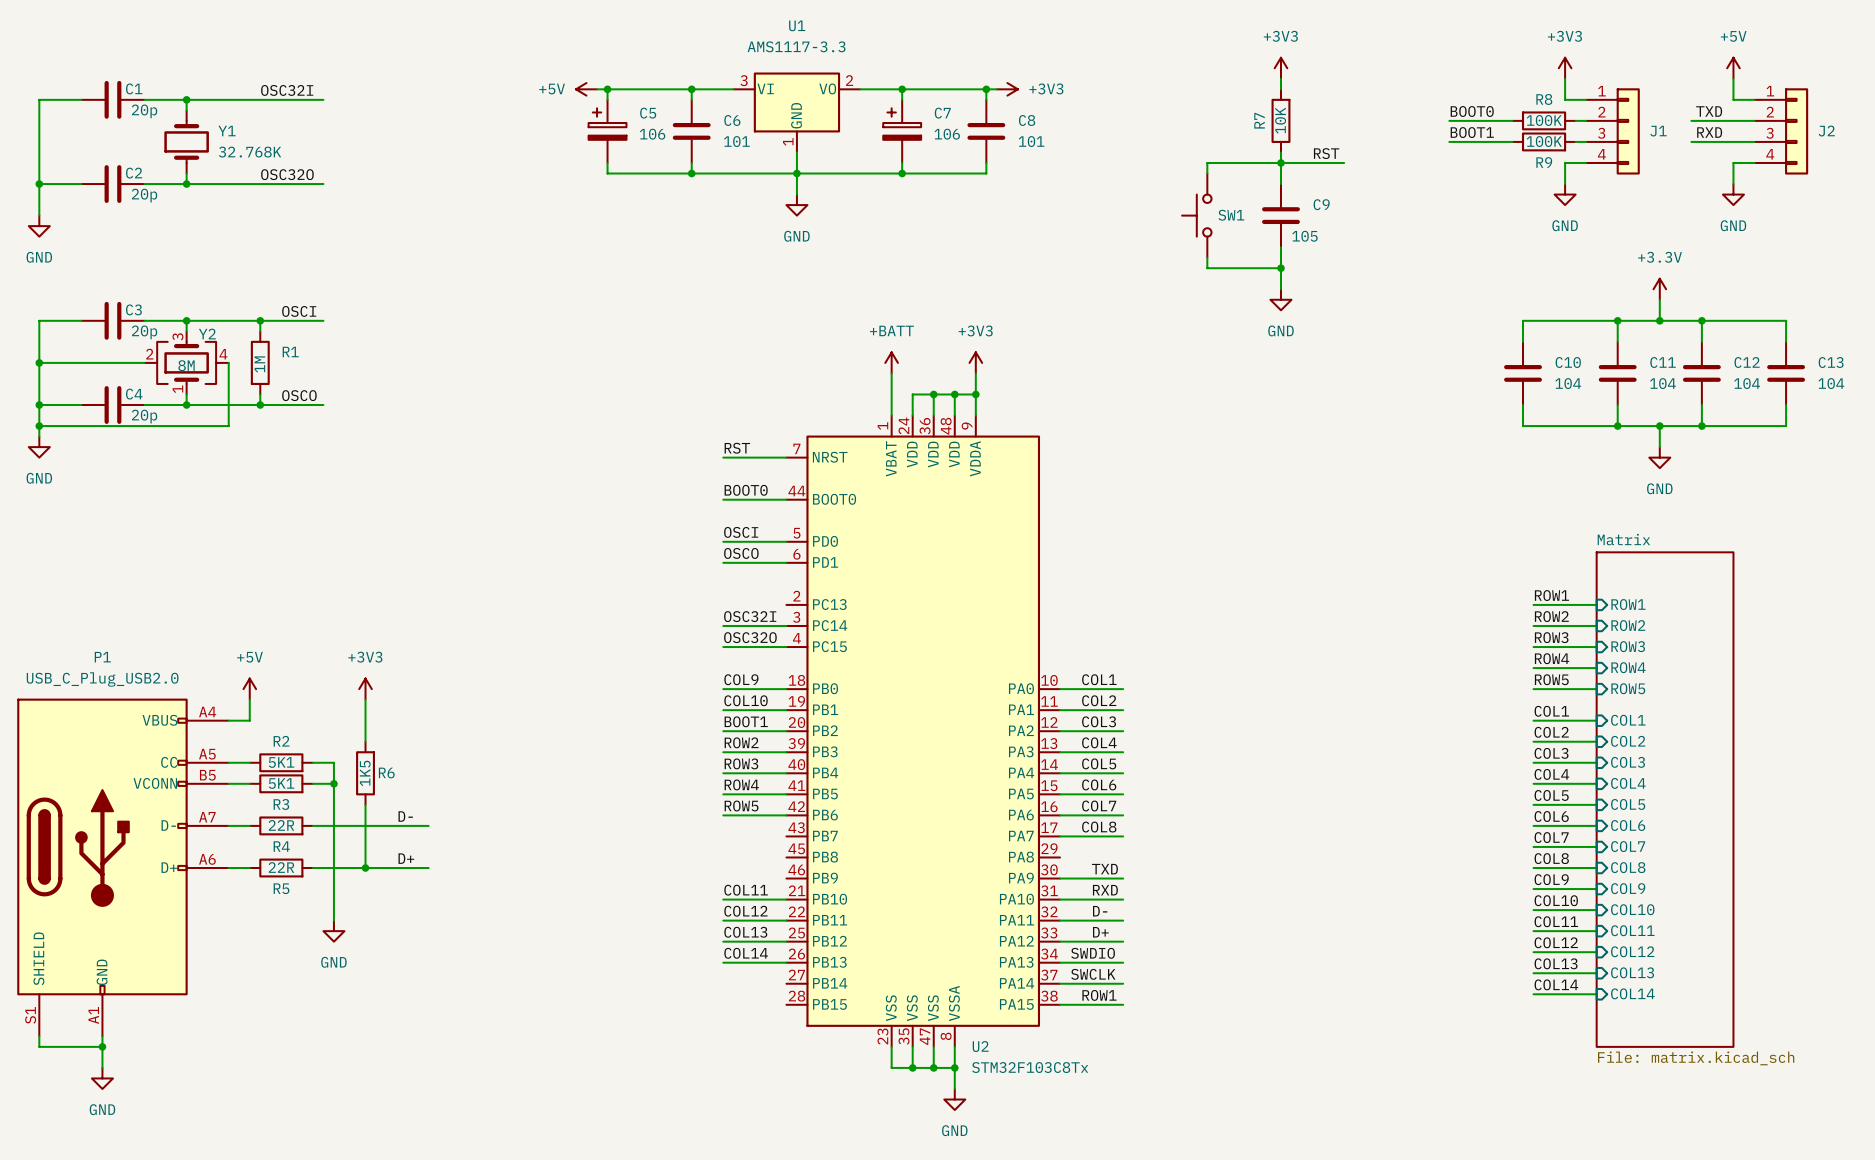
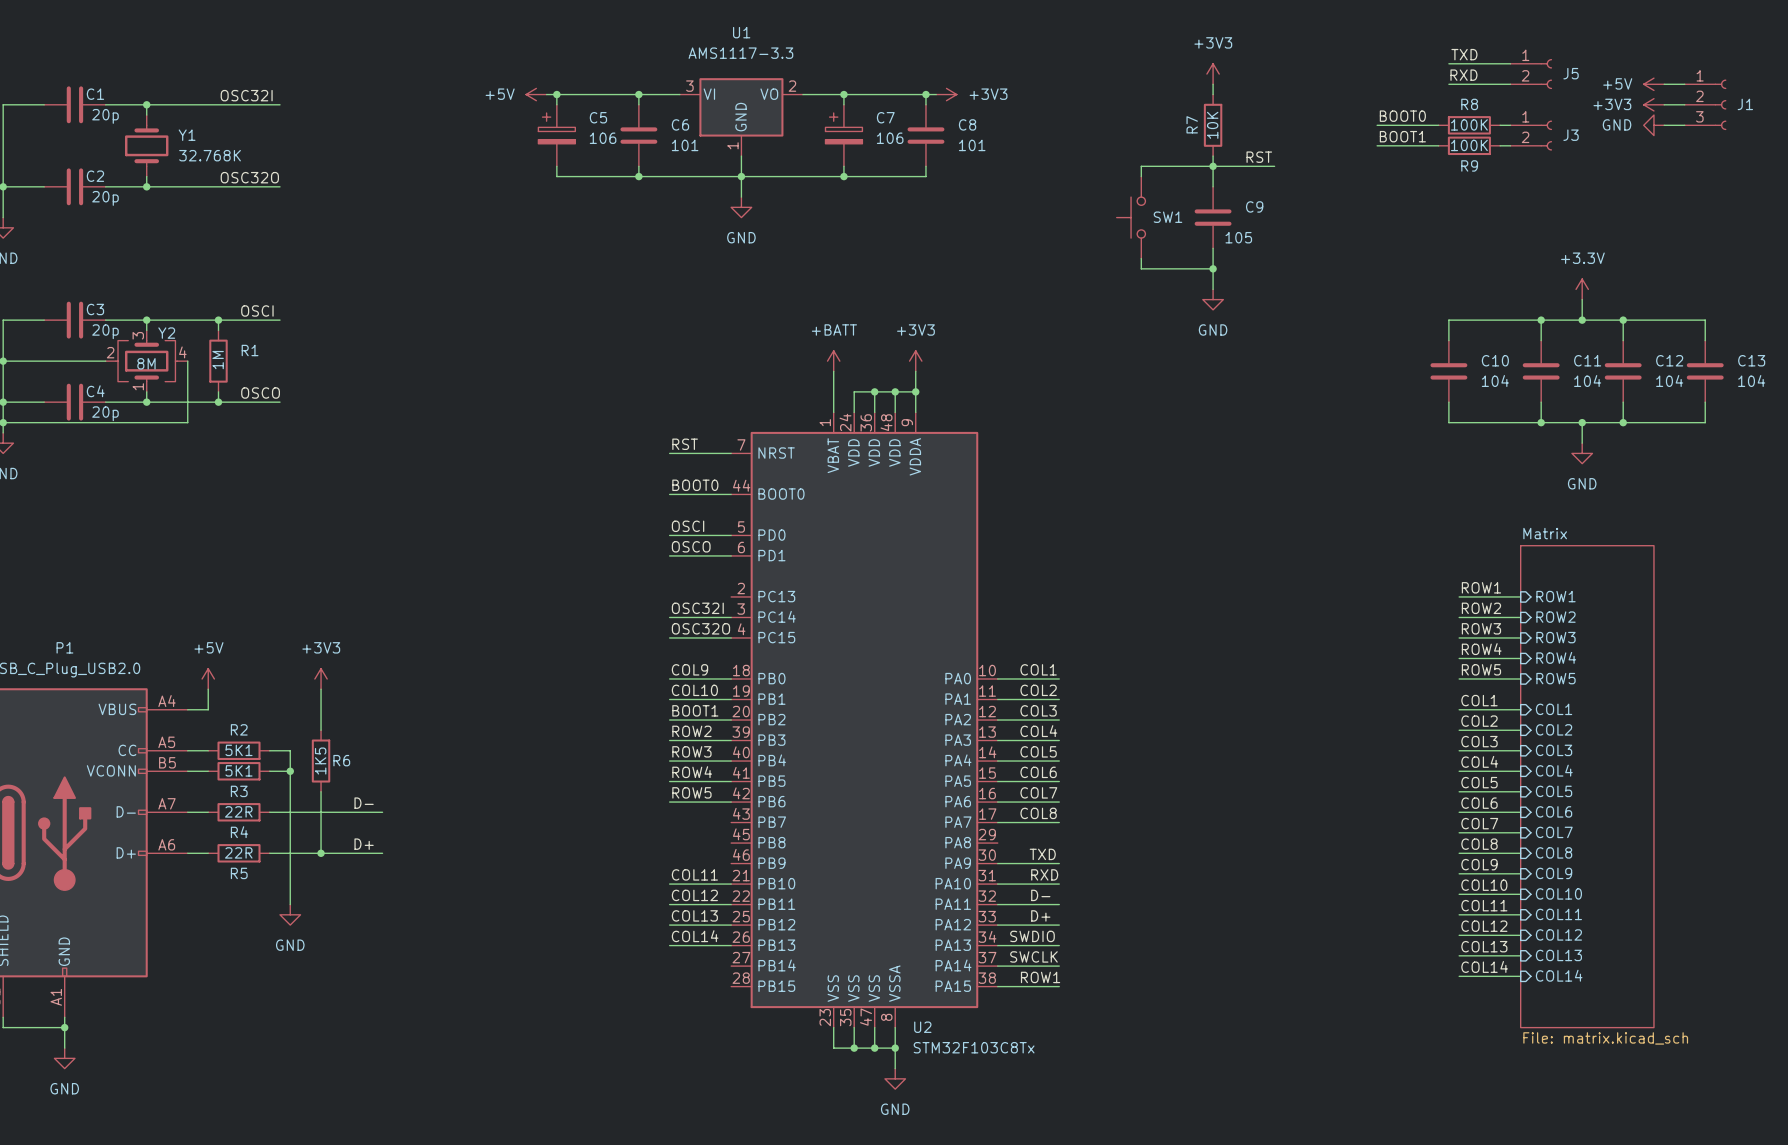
wire: none -> (1448, 63) (1510, 63)
power symbol rotation: 0° (1565, 68) -> 90° counterclockwise (1653, 104)
power symbol position: +3V3 (1565, 68) -> +3V3 (1653, 104)
J5: none -> (1531, 74)
power symbol rotation: 0° (1733, 68) -> 90° counterclockwise (1653, 84)
wire: (1565, 78) (1565, 99) (1586, 99) -> none
wire: none -> (1664, 84) (1684, 84)
J1 symbol: [1586, 88, 1640, 175] -> [1684, 79, 1727, 131]
label position: TXD (1709, 111) -> TXD (1464, 54)
wire: (1691, 120) (1743, 120) -> none
J3: none -> (1531, 135)
J2: (1781, 131) -> none
label position: RXD (1709, 132) -> RXD (1463, 75)
wire: (1691, 141) (1754, 141) -> (1448, 84) (1510, 84)
wire: (1586, 162) (1565, 162) (1565, 184) -> none
wire: (1754, 162) (1733, 162) (1733, 184) -> none
power symbol: GND (1565, 194) -> none
power symbol rotation: 0° (1733, 194) -> 90° clockwise (1653, 125)
power symbol position: GND (1733, 194) -> GND (1653, 125)

